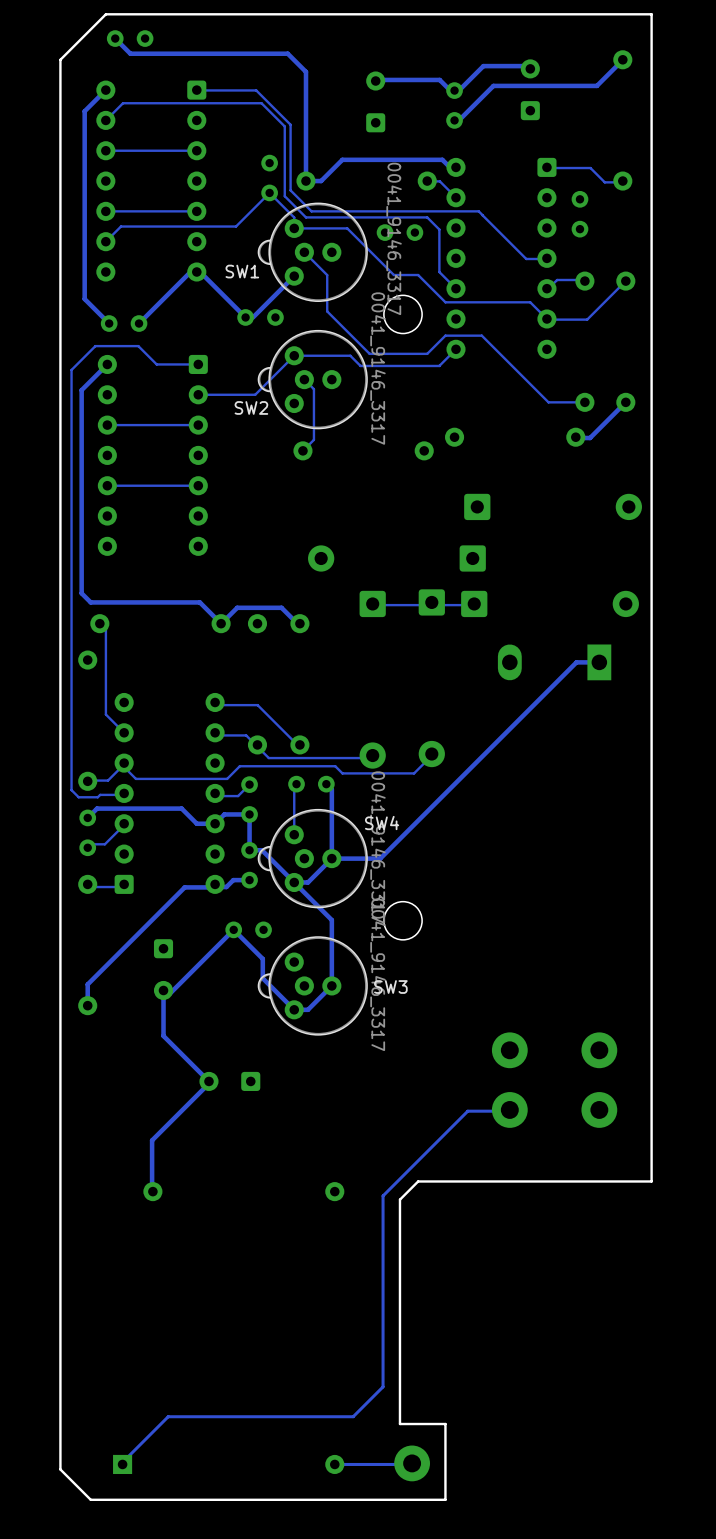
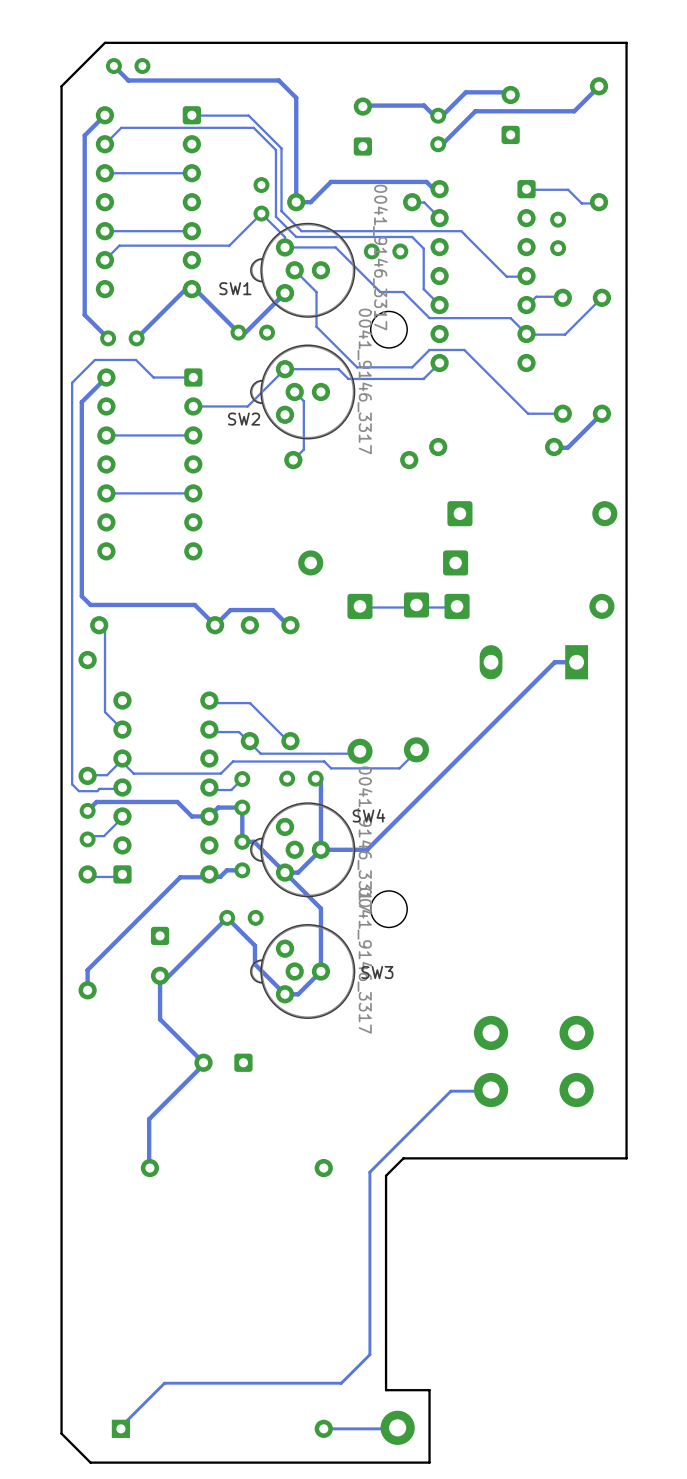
track: (296, 784) (294, 786) (294, 834) -> none

